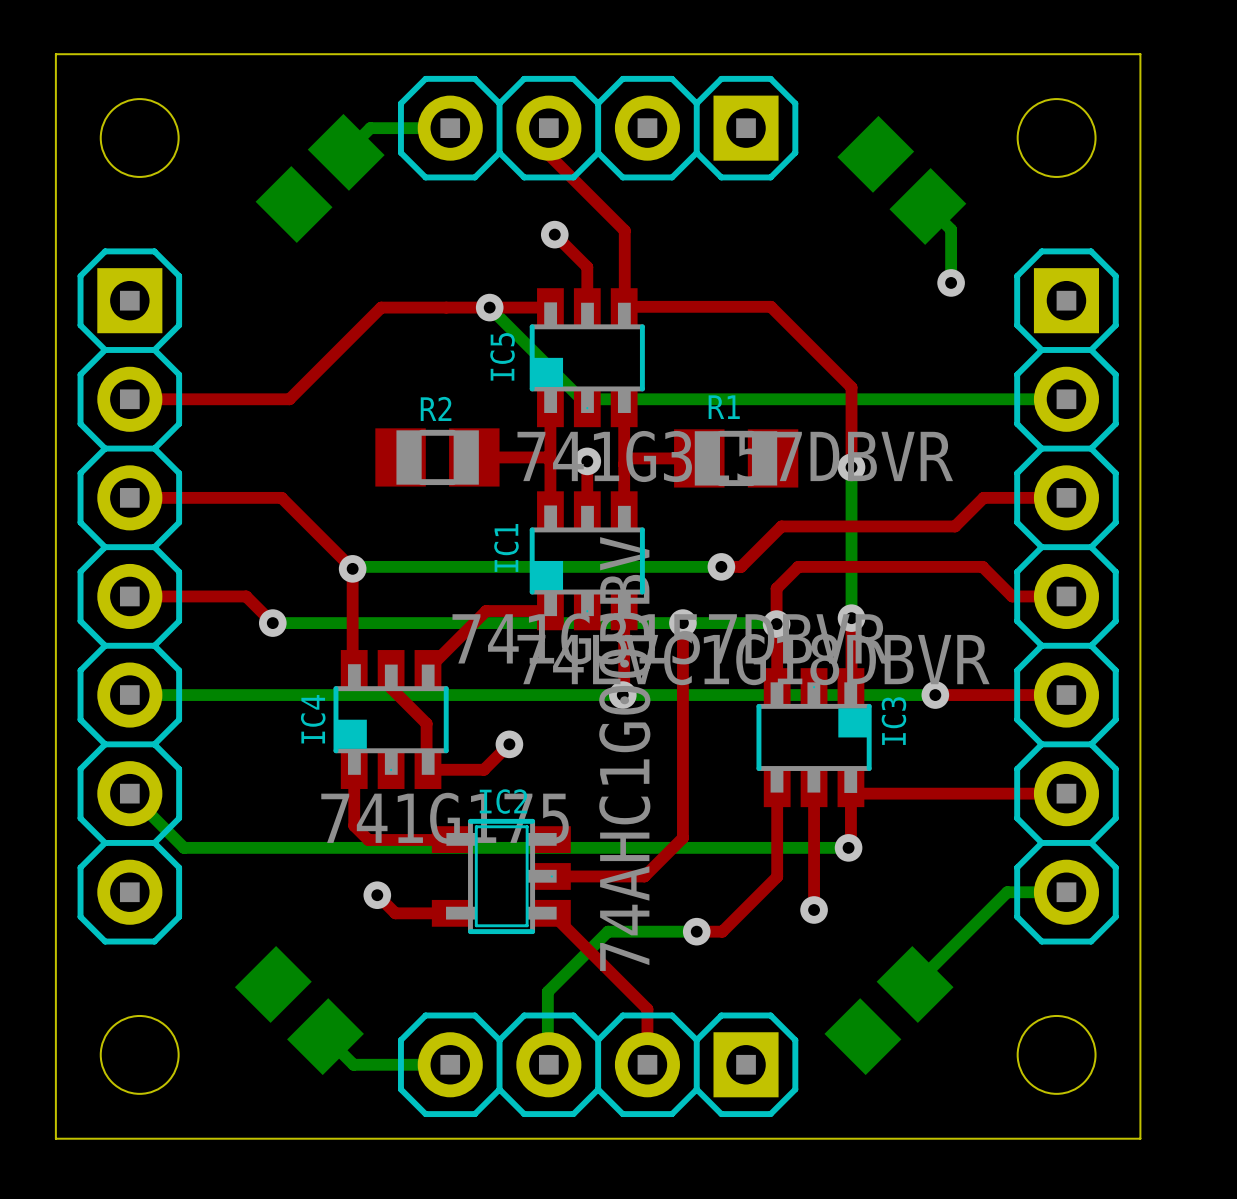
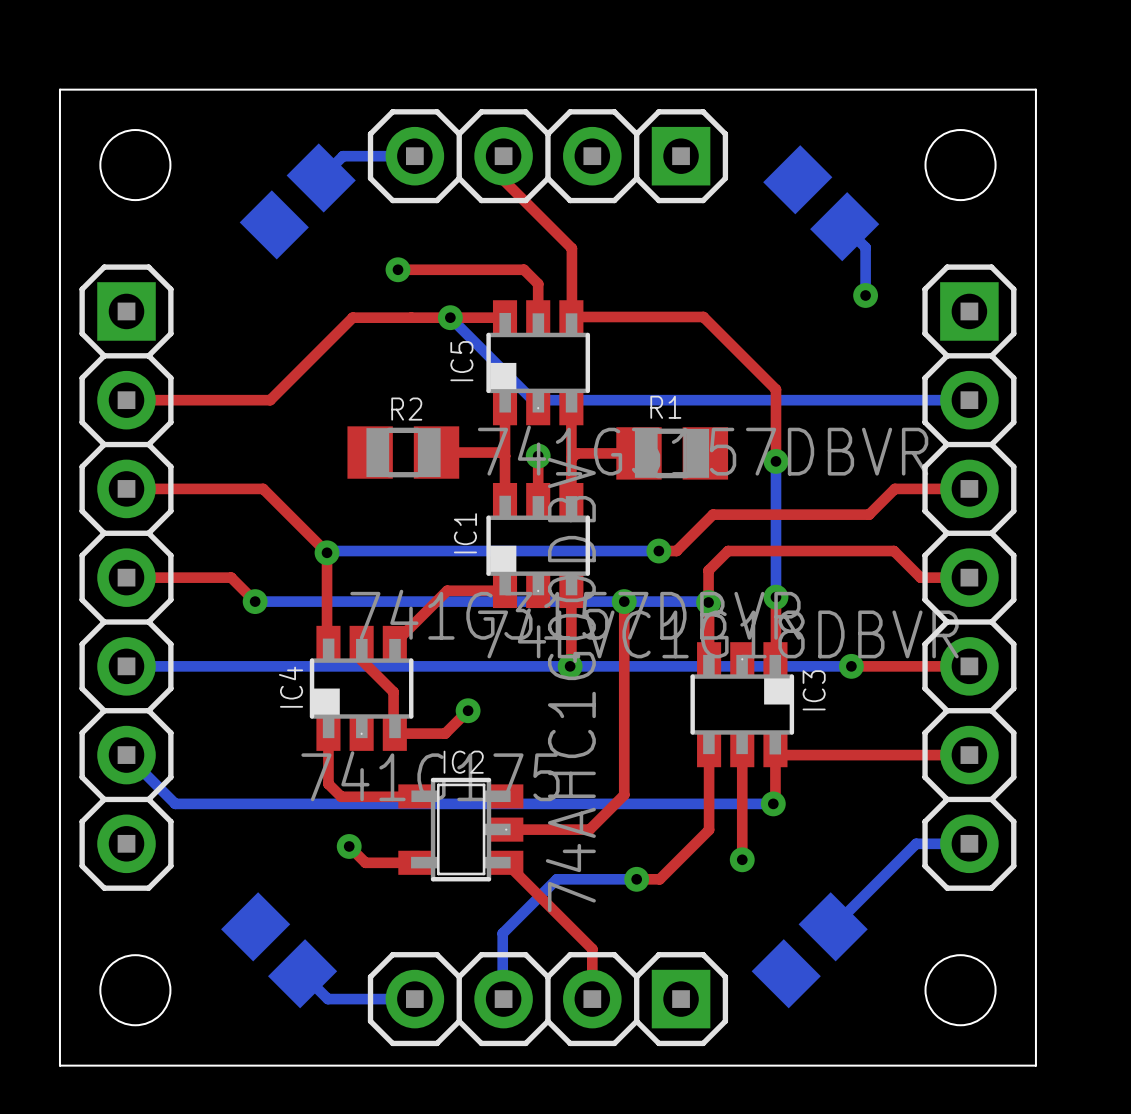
top track: (554, 234) (587, 267) (587, 270) -> (398, 269) (524, 269) (538, 283)
via position: (554, 234) -> (398, 269)

